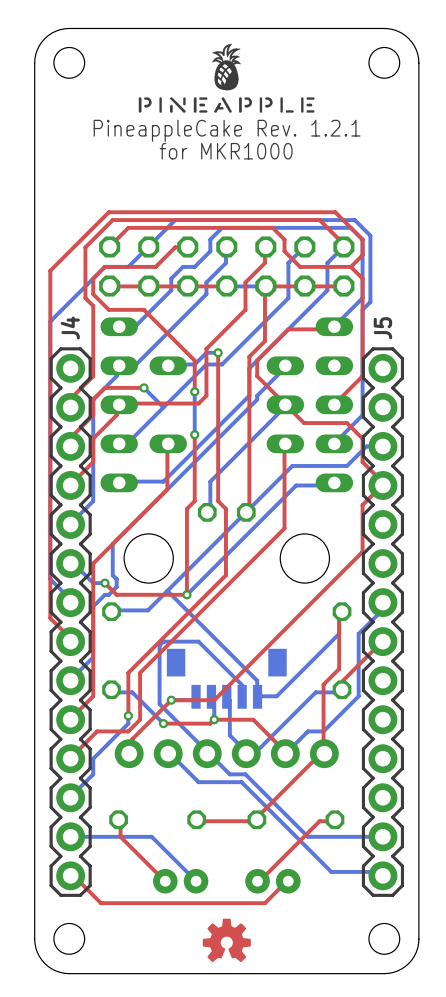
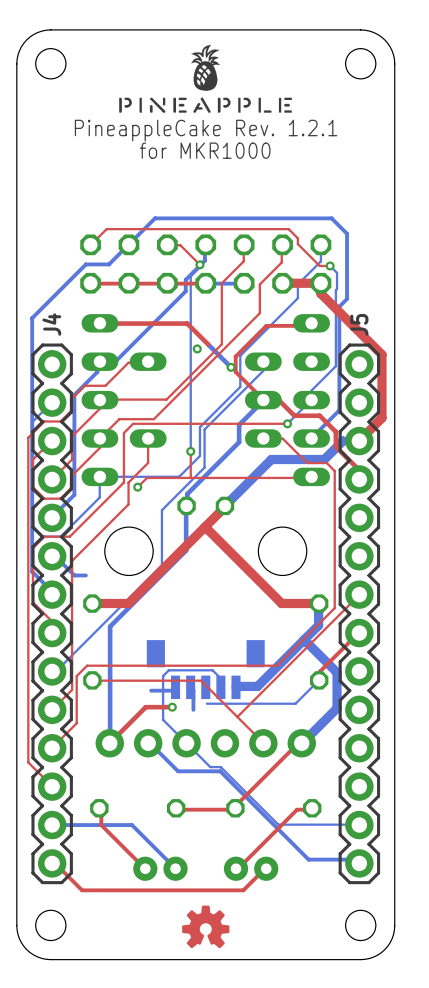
top track: (109, 246) (128, 227) (272, 227) (284, 239) (284, 251) (300, 266) (350, 266) -> (90, 244) (106, 229) (288, 229) (297, 238) (297, 244) (319, 265) (330, 265)
top track: (187, 246) (175, 247) (155, 266) (104, 266) (93, 278) (93, 294) (108, 309) (143, 309) (194, 360) (194, 391) -> (167, 244) (180, 245) (199, 264)
top track: (265, 246) (264, 262) (245, 282) (245, 309) (206, 348) (206, 395) (198, 403) (120, 403) (116, 407) (116, 415) (93, 438) (93, 462) (70, 485) -> (244, 244) (243, 261) (221, 283) (221, 344) (166, 399) (99, 400) (99, 408) (72, 436) (72, 459) (52, 479)
bottom track: (304, 246) (288, 262) (288, 298) (222, 364) (206, 364) (128, 442) (119, 443) -> none
bottom track: (343, 246) (327, 262) (327, 290) (249, 368) (249, 395) (163, 481) (119, 482) -> (320, 244) (320, 261) (297, 284) (297, 298) (240, 355) (240, 386) (199, 427) (199, 456) (179, 476) (99, 476) (99, 497) (60, 536) (43, 536) (32, 526) (32, 421) (52, 402)
top track: (343, 246) (343, 243) (319, 220) (112, 220) (85, 247) (85, 298) (93, 305) (93, 376) (73, 395) (73, 403) (70, 407) -> none
top track: (350, 266) (362, 255) (362, 239) (335, 212) (108, 212) (50, 270) (50, 618) (69, 637) (70, 641) -> (287, 423) (133, 423) (123, 433) (123, 482) (69, 536) (44, 536) (32, 548) (32, 602) (51, 620) (52, 633)
top track: (350, 266) (362, 278) (362, 376) (334, 404) -> none
bottom track: none -> (199, 264) (190, 276) (190, 451)
via: none -> (199, 264)
bottom track: none -> (330, 265) (337, 272) (335, 366) (311, 390) (311, 400) (287, 423)
via: none -> (330, 265)
top track: none -> (282, 283) (320, 283) (320, 293) (381, 354) (381, 418) (359, 441)
top track: (343, 286) (264, 286) (264, 341) (249, 356) (249, 508) (246, 512) -> (92, 603) (128, 603) (224, 505)
bottom track: (119, 326) (136, 325) (171, 290) (171, 278) (183, 266) (194, 266) (210, 251) (210, 239) (222, 227) (350, 227) (362, 239) (362, 298) (334, 326) -> none
top track: none -> (99, 323) (187, 323) (208, 344)
bottom track: none -> (208, 344) (231, 367)
bottom track: (218, 352) (206, 352) (194, 364) (168, 365) -> none
top track: (218, 352) (218, 501) (225, 508) (225, 575) (128, 672) (128, 715) -> none
top track: none -> (148, 361) (128, 362) (105, 385) (84, 385) (72, 398) (72, 409) (60, 421) (44, 421) (28, 437) (28, 762) (52, 786)
bottom track: (285, 365) (257, 395) (257, 399) (112, 544) (112, 575) (116, 579) (116, 586) (93, 606) (93, 657) (70, 680) -> (263, 361) (263, 370) (204, 429) (204, 467) (161, 510) (161, 565) (57, 670) (52, 671)
via: none -> (231, 367)
bottom track: (143, 387) (163, 407) -> none
top track: (143, 387) (104, 387) (93, 399) (93, 415) (73, 434) (73, 442) (70, 446) -> (282, 244) (281, 262) (259, 284) (259, 313) (153, 419) (119, 419) (99, 438) (99, 447) (72, 475) (72, 487) (60, 498) (44, 498) (32, 487) (32, 459) (52, 441)
via: (143, 387) -> none
bottom track: (194, 391) (194, 434) -> none
via: (194, 391) -> none
top track: (284, 403) (304, 423) (346, 423) (362, 438) (362, 462) (382, 481) (382, 485) (362, 505) (362, 551) (214, 700) (171, 700) (132, 739) (132, 750) (129, 753) -> (172, 707) (145, 707) (109, 743)
top track: none -> (262, 398) (265, 400) (279, 400) (294, 415) (319, 415) (335, 431) (335, 446) (358, 469) (359, 479)
bottom track: (285, 404) (210, 481) (210, 508) (207, 512) -> (263, 400) (239, 424) (239, 442) (187, 494) (186, 550) (110, 626) (109, 743)
via: none -> (287, 423)
top track: (194, 434) (194, 501) (186, 508) (186, 594) (116, 594) (104, 583) -> none
via position: (194, 434) -> (190, 451)
top track: (168, 443) (167, 489) (93, 563) (93, 696) (70, 719) -> (148, 438) (148, 462) (128, 482) (128, 504) (72, 560) (72, 689) (52, 709)
top track: (285, 443) (284, 528) (140, 672) (140, 719) (128, 731) (97, 731) (70, 758) -> (263, 438) (282, 438) (307, 462) (326, 462) (334, 471) (334, 608) (277, 665) (87, 665) (76, 676) (76, 723) (52, 748)
bottom track: (366, 446) (346, 465) (292, 465) (147, 610) (111, 611) -> (343, 441) (324, 459) (271, 459) (224, 505)
top track: none -> (190, 451) (190, 477)
bottom track: (334, 482) (331, 485) (296, 485) (186, 594) -> none
top track: none -> (311, 476) (146, 477) (137, 487)
via: none -> (137, 487)
via: (104, 583) -> none
bottom track: (167, 590) (257, 680) (257, 696) (276, 696) (339, 633) (339, 614) (342, 611) -> (236, 687) (257, 686) (318, 625) (319, 603)
via: (186, 594) -> none
bottom track: (382, 602) (382, 610) (358, 633) (358, 696) (323, 731) (307, 731) (285, 753) -> none
top track: none -> (359, 594) (237, 716)
top track: (342, 611) (339, 614) (339, 668) (323, 684) (323, 750) -> (319, 603) (281, 603) (205, 526)
bottom track: none -> (304, 639) (337, 672) (337, 708) (301, 743)
bottom track: (111, 689) (112, 692) (132, 692) (163, 723) -> none
bottom track: (342, 689) (339, 692) (315, 692) (257, 750) (249, 750) (246, 753) (229, 735) (229, 700) (226, 696) -> (319, 680) (295, 703) (206, 703)
bottom track: (242, 696) (241, 684) (198, 641) (163, 641) (159, 645) (159, 704) (229, 774) (245, 774) (307, 836) (382, 836) -> (220, 687) (220, 678) (212, 670) (168, 670) (163, 676) (163, 719) (210, 767) (220, 767) (278, 824) (359, 825)
via: (171, 700) -> none
bottom track: (128, 715) (128, 723) (93, 758) (93, 774) (70, 797) -> none
via: (128, 715) -> none
via: none -> (172, 707)
via: (214, 719) -> none
top track: (163, 723) (210, 723) (214, 719) (253, 719) (285, 753) -> (92, 680) (201, 680) (263, 743)
via: (163, 723) -> none

